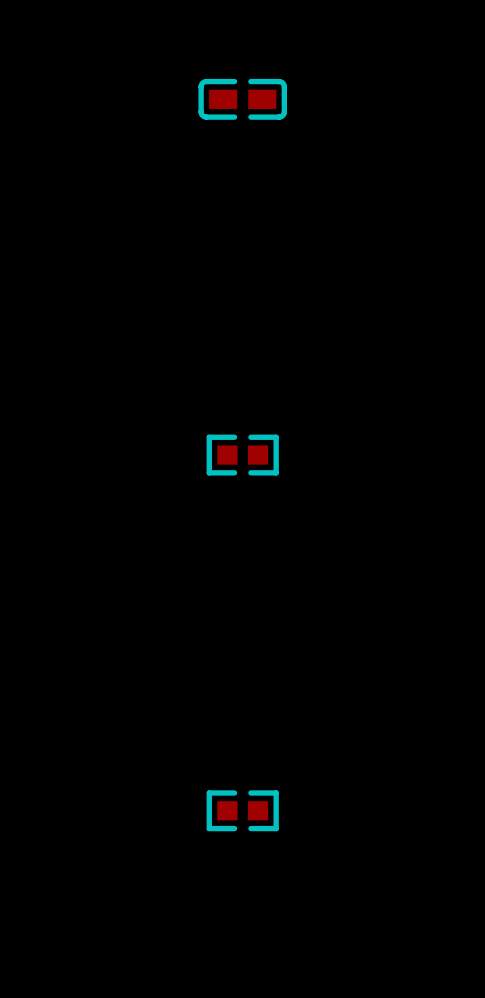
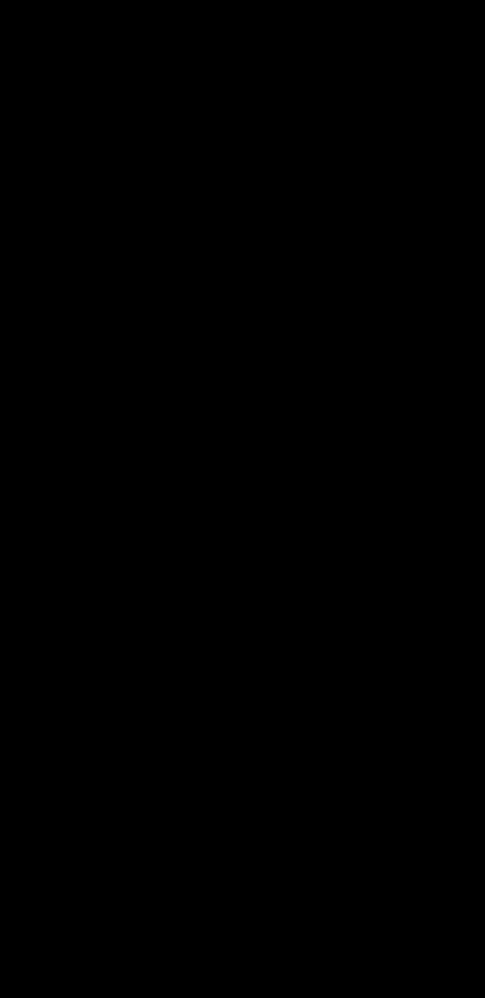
part: (242, 99) -> none
part: (242, 455) -> none
part: (242, 810) -> none

